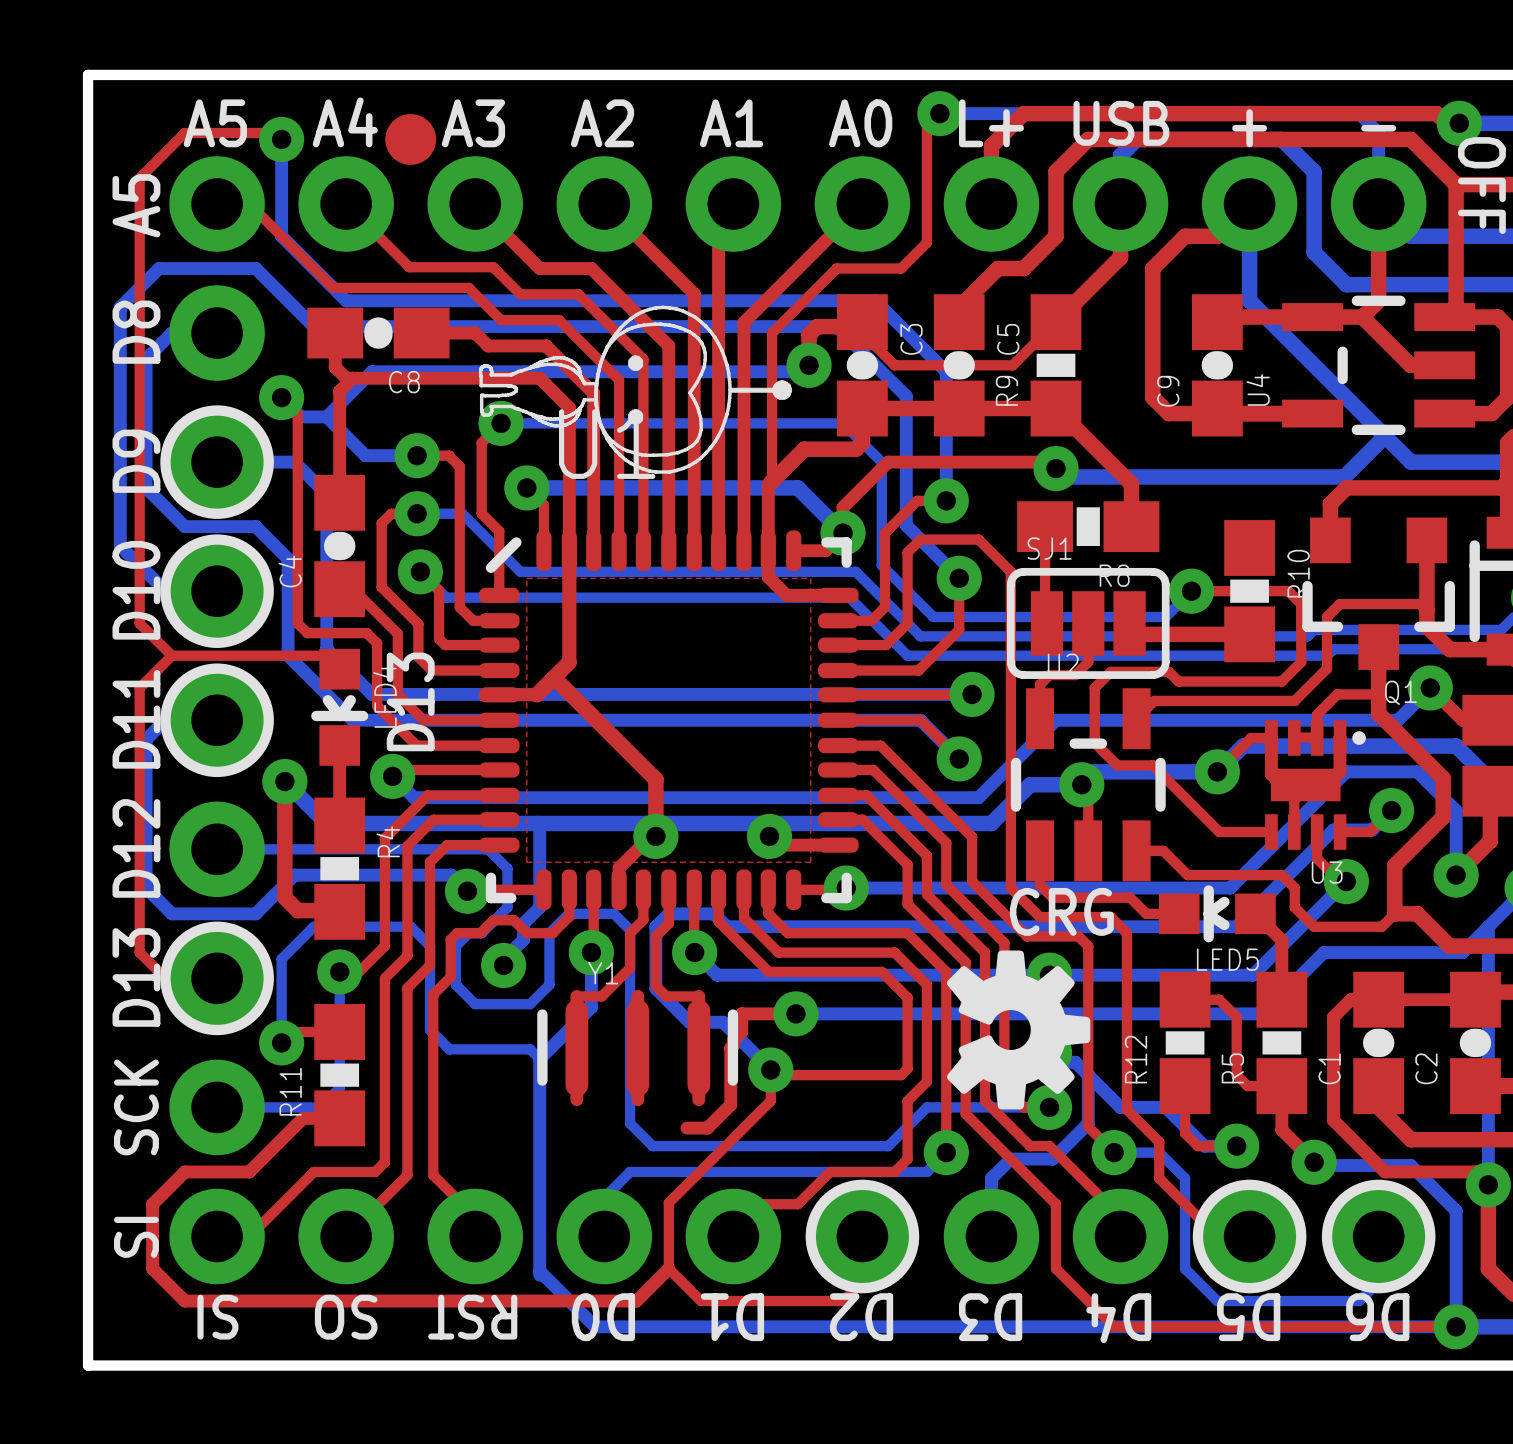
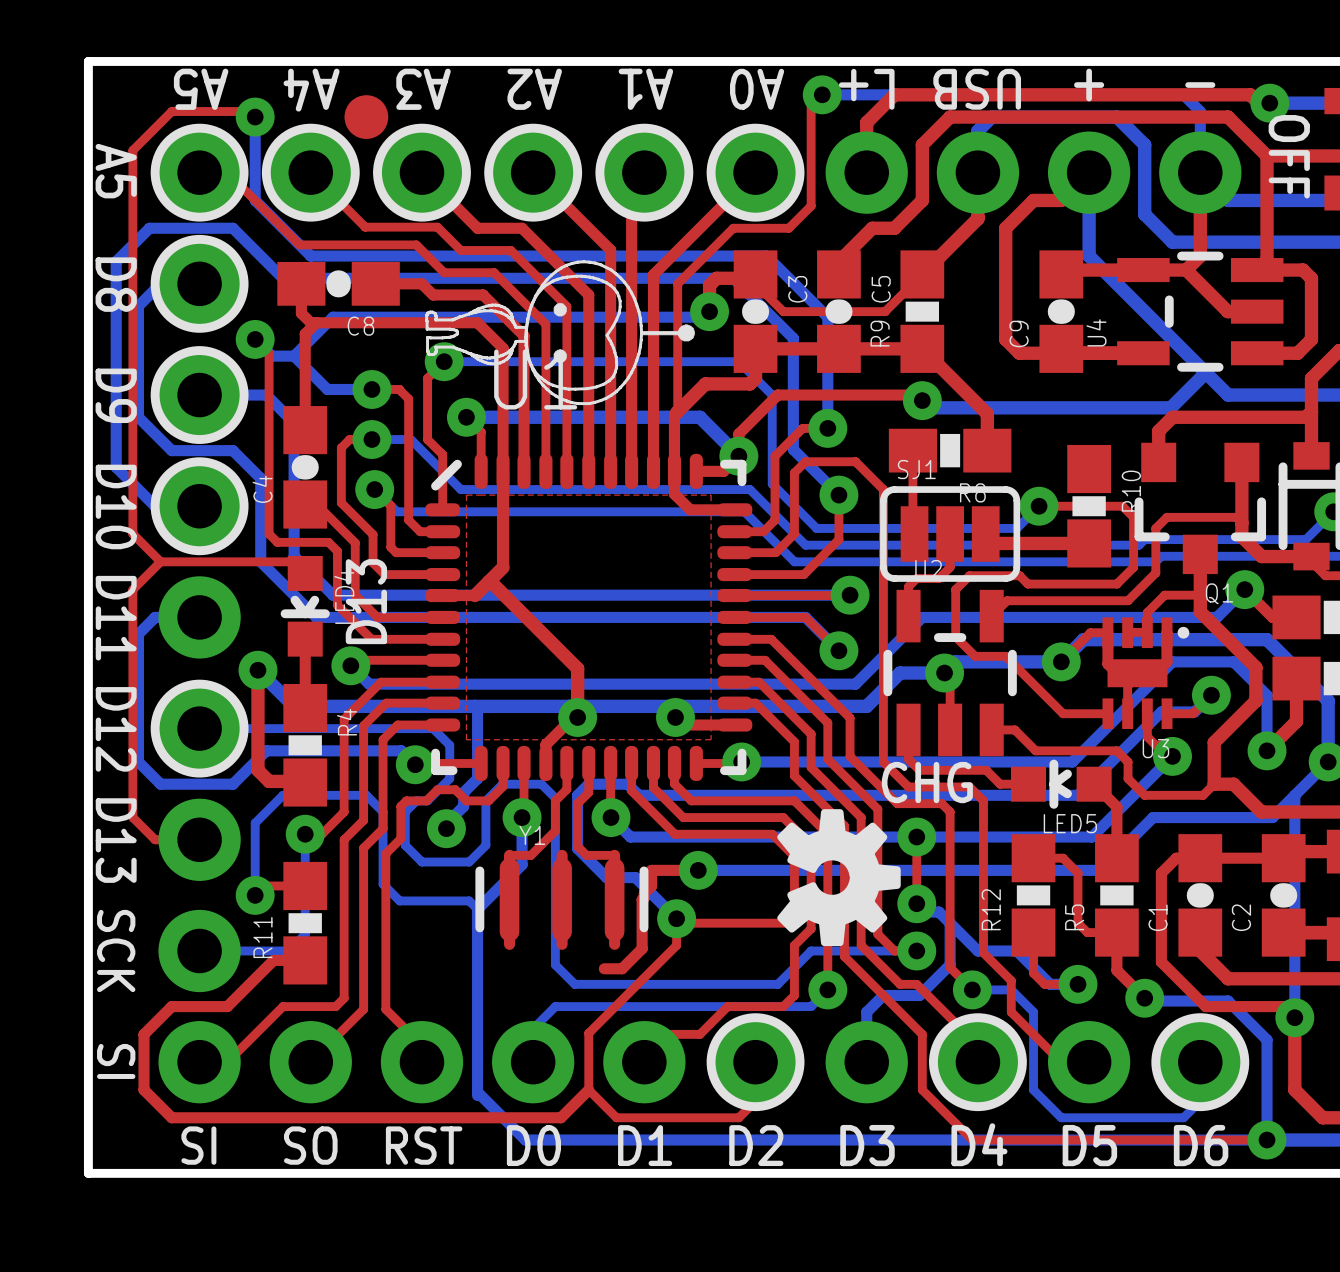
part footprint: [160, 156, 1436, 1294] -> [150, 123, 1250, 1112]
text: CRG (1061, 911) -> CHG (927, 782)
drawing position: (1018, 1030) -> (838, 877)

